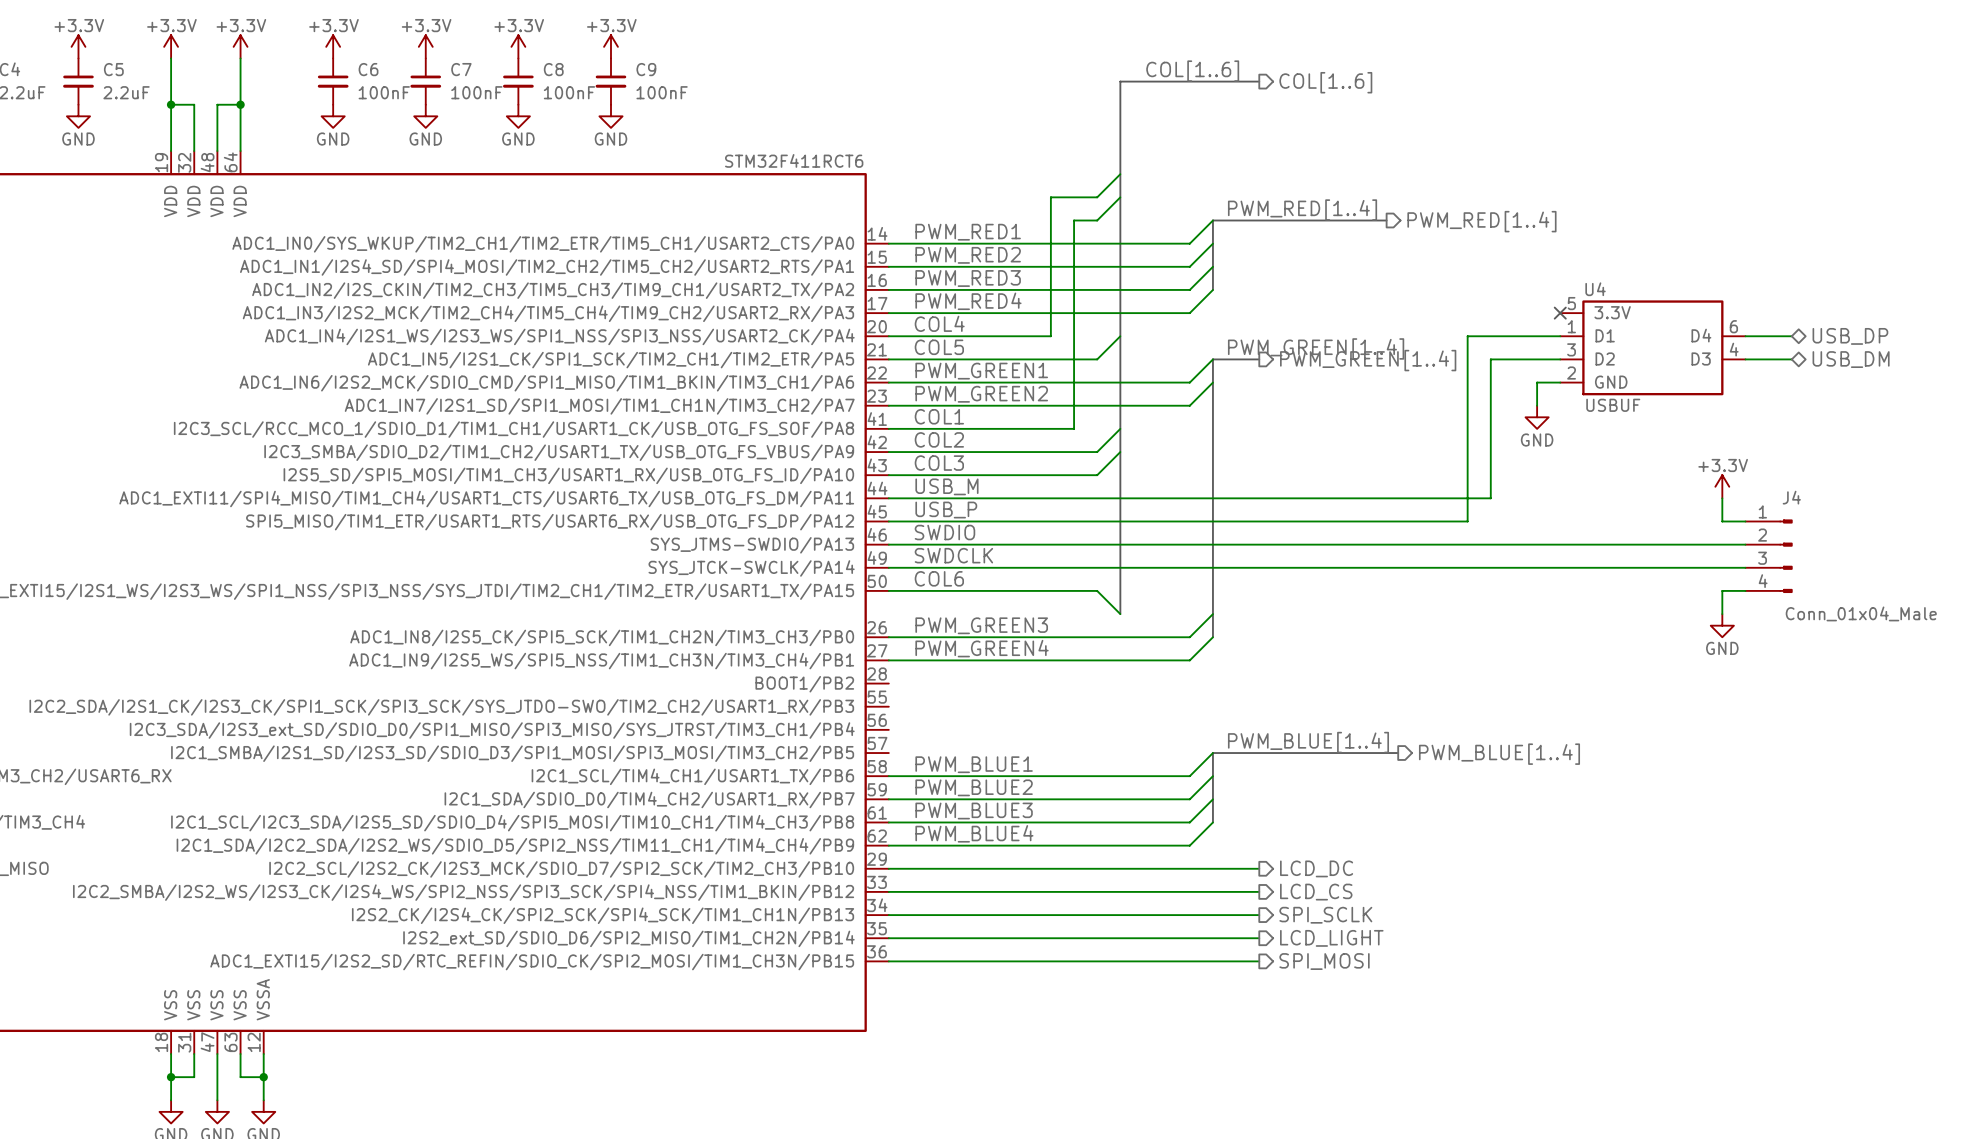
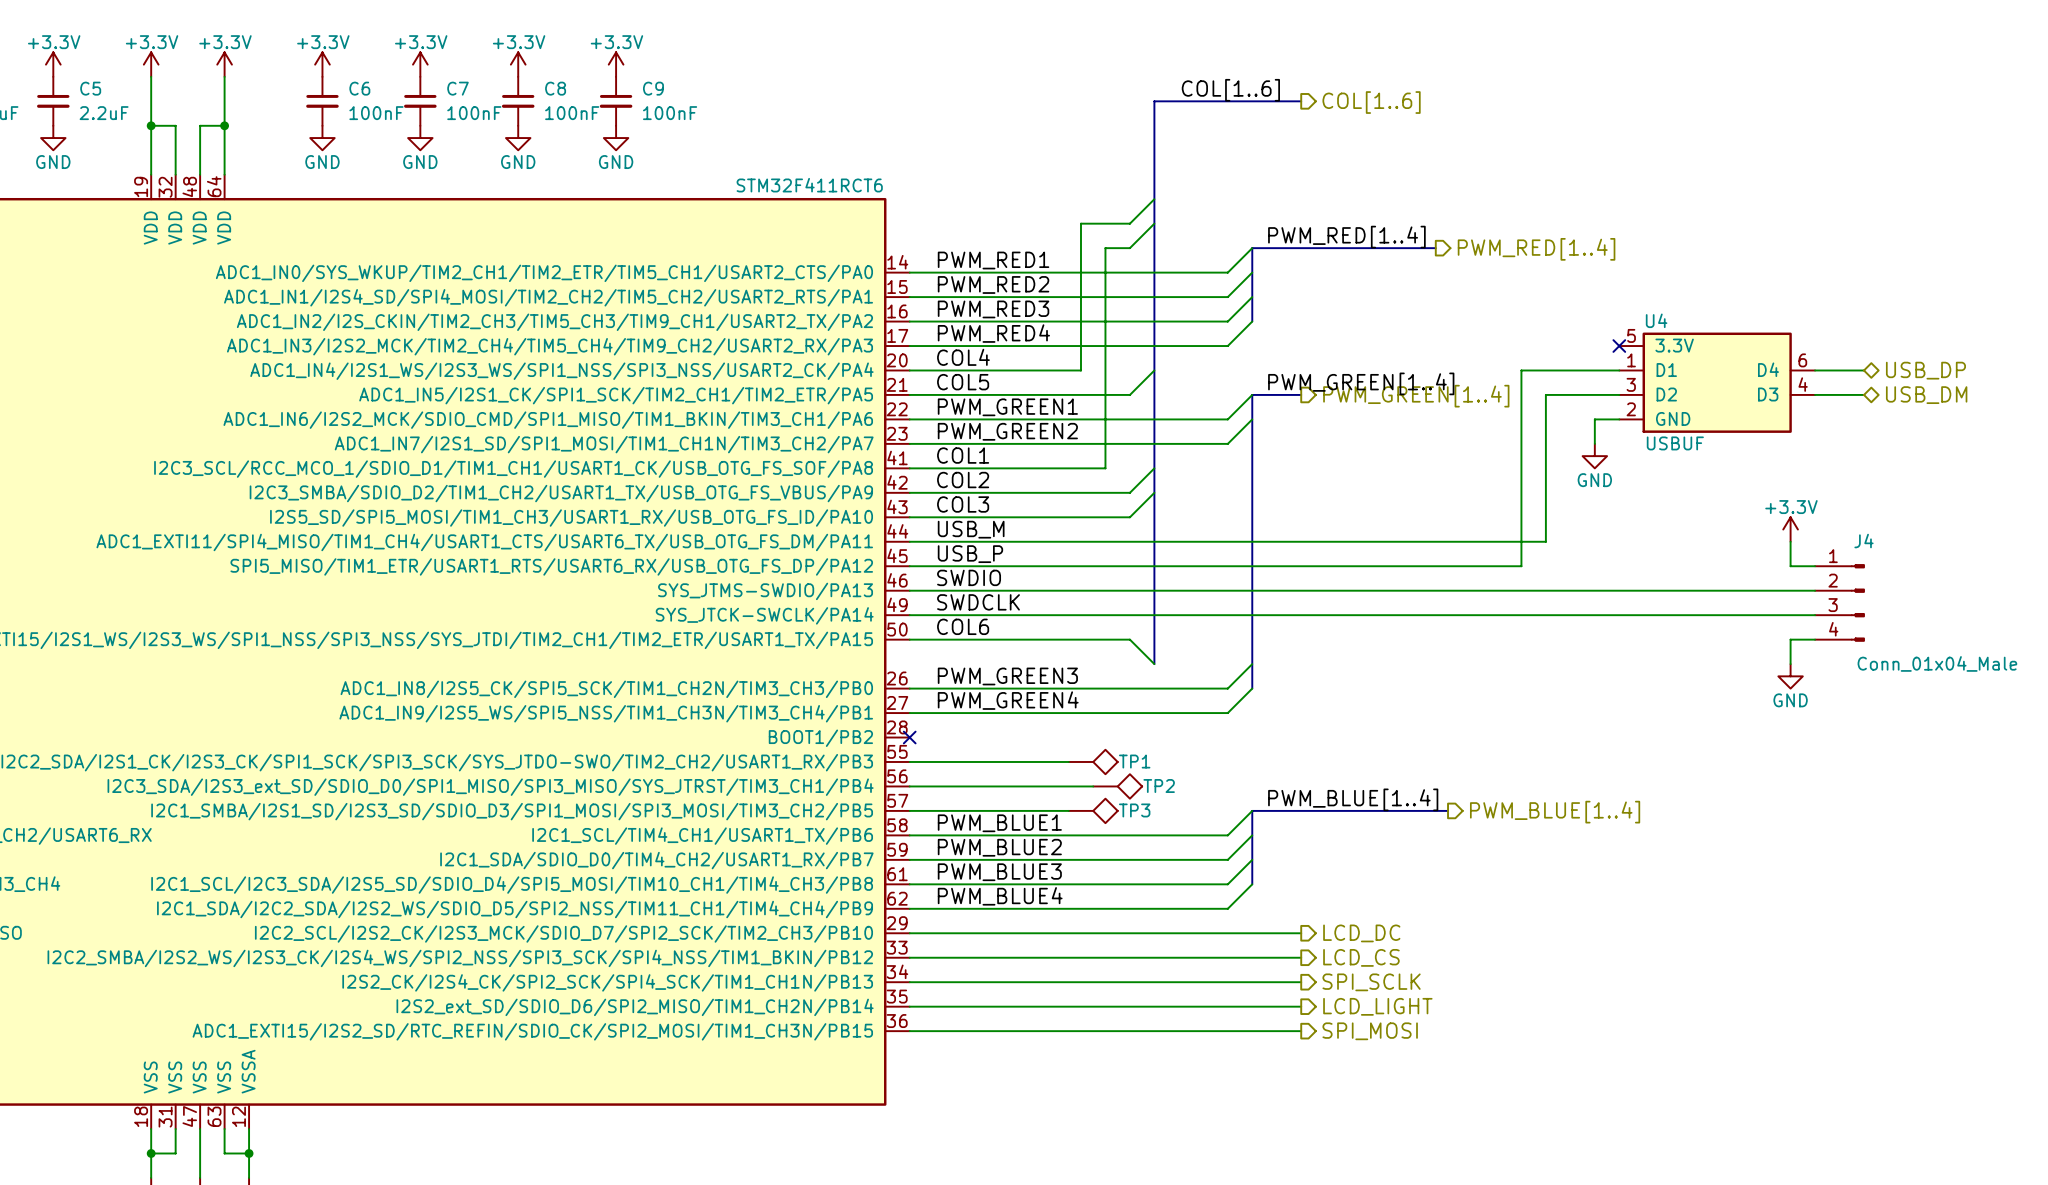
no-connect mark: none -> (909, 737)
wire: none -> (909, 761) (1068, 761)
TP1: none -> (1093, 761)
wire: none -> (909, 786) (1093, 786)
TP2: none -> (1117, 786)
wire: none -> (909, 810) (1068, 810)
TP3: none -> (1093, 810)

